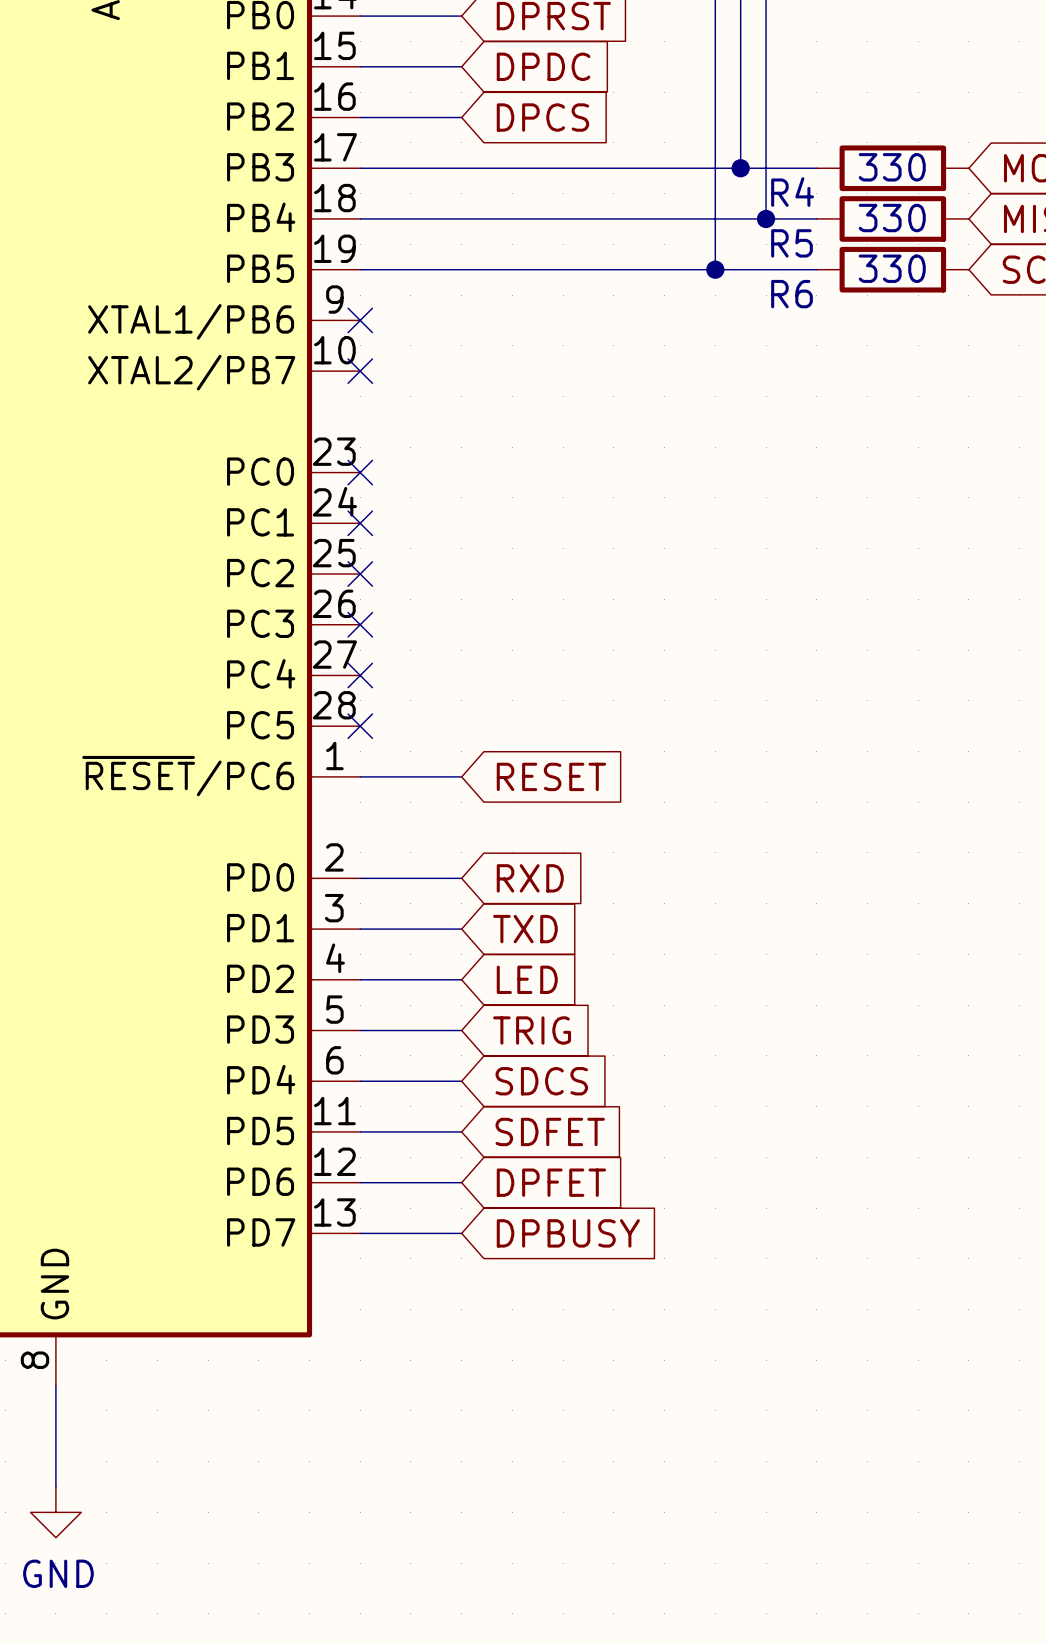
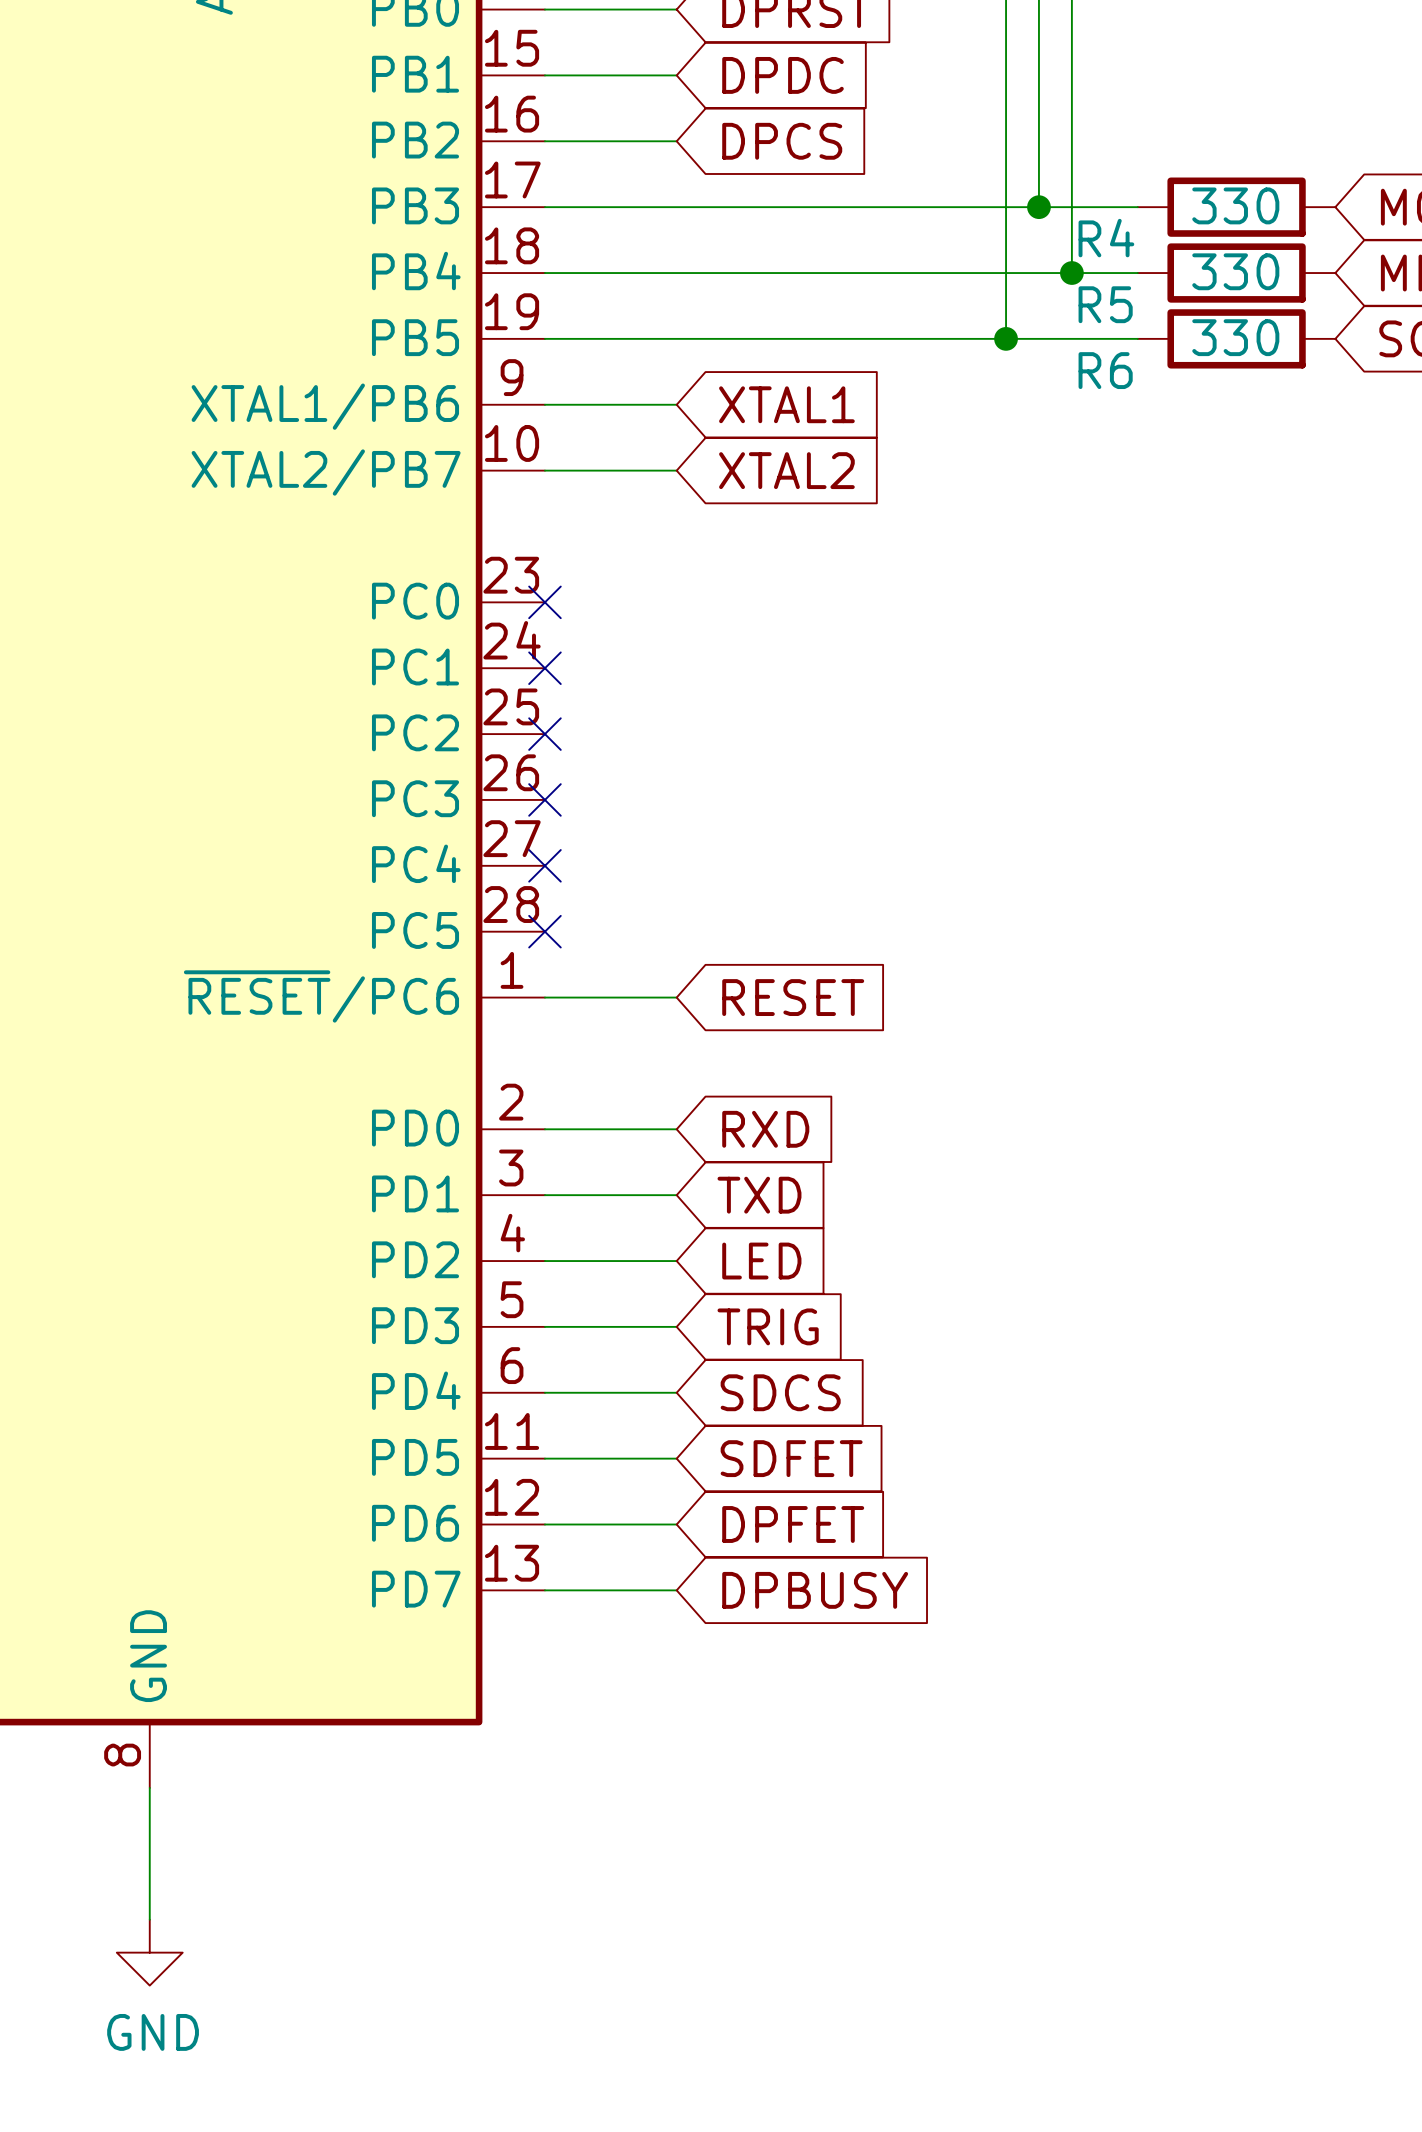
wire: none -> (544, 404) (676, 404)
no-connect mark: (360, 320) -> none
global label: none -> XTAL1 (786, 404)
wire: none -> (544, 470) (676, 470)
no-connect mark: (360, 371) -> none
global label: none -> XTAL2 (786, 470)

